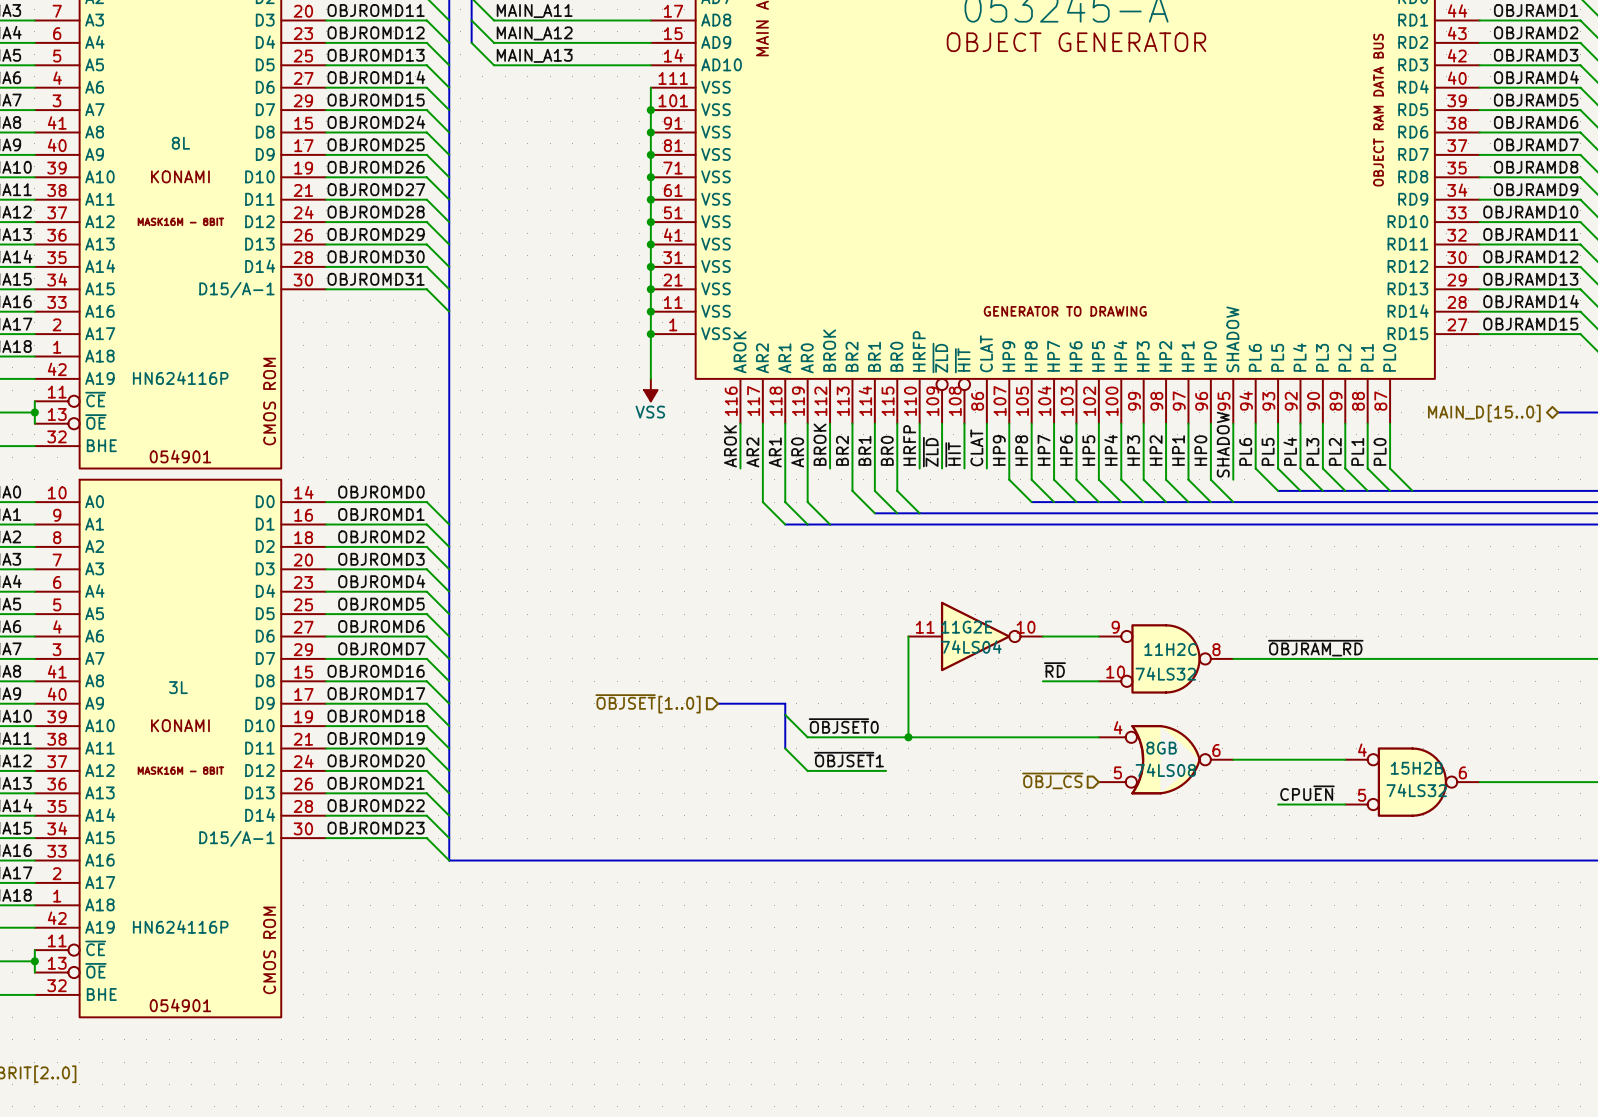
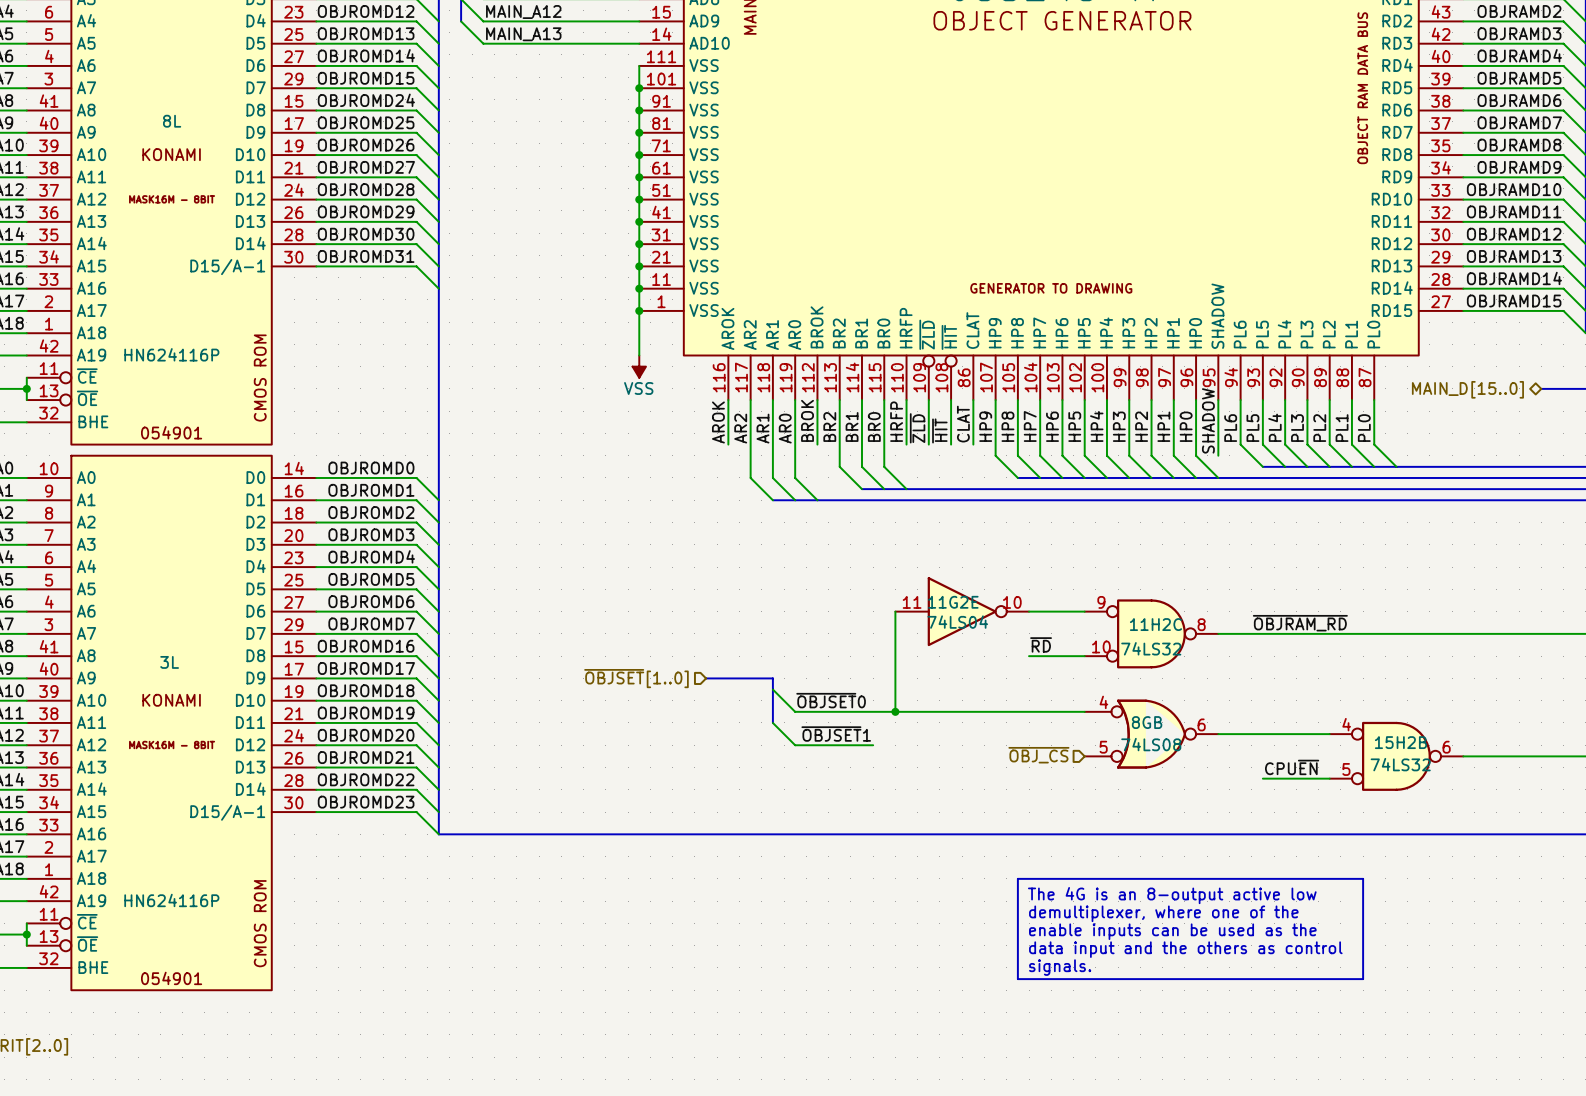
line: none -> (1017, 878) (1363, 878) (1363, 979) (1017, 979) (1017, 878)
text: none -> The 4G is an 8-output active low (1172, 895)
text: none -> demultiplexer, where one of the (1163, 913)
text: none -> enable inputs can be used as the (1172, 931)
text: none -> data input and the others as control (1185, 949)
text: none -> signals. (1060, 967)

